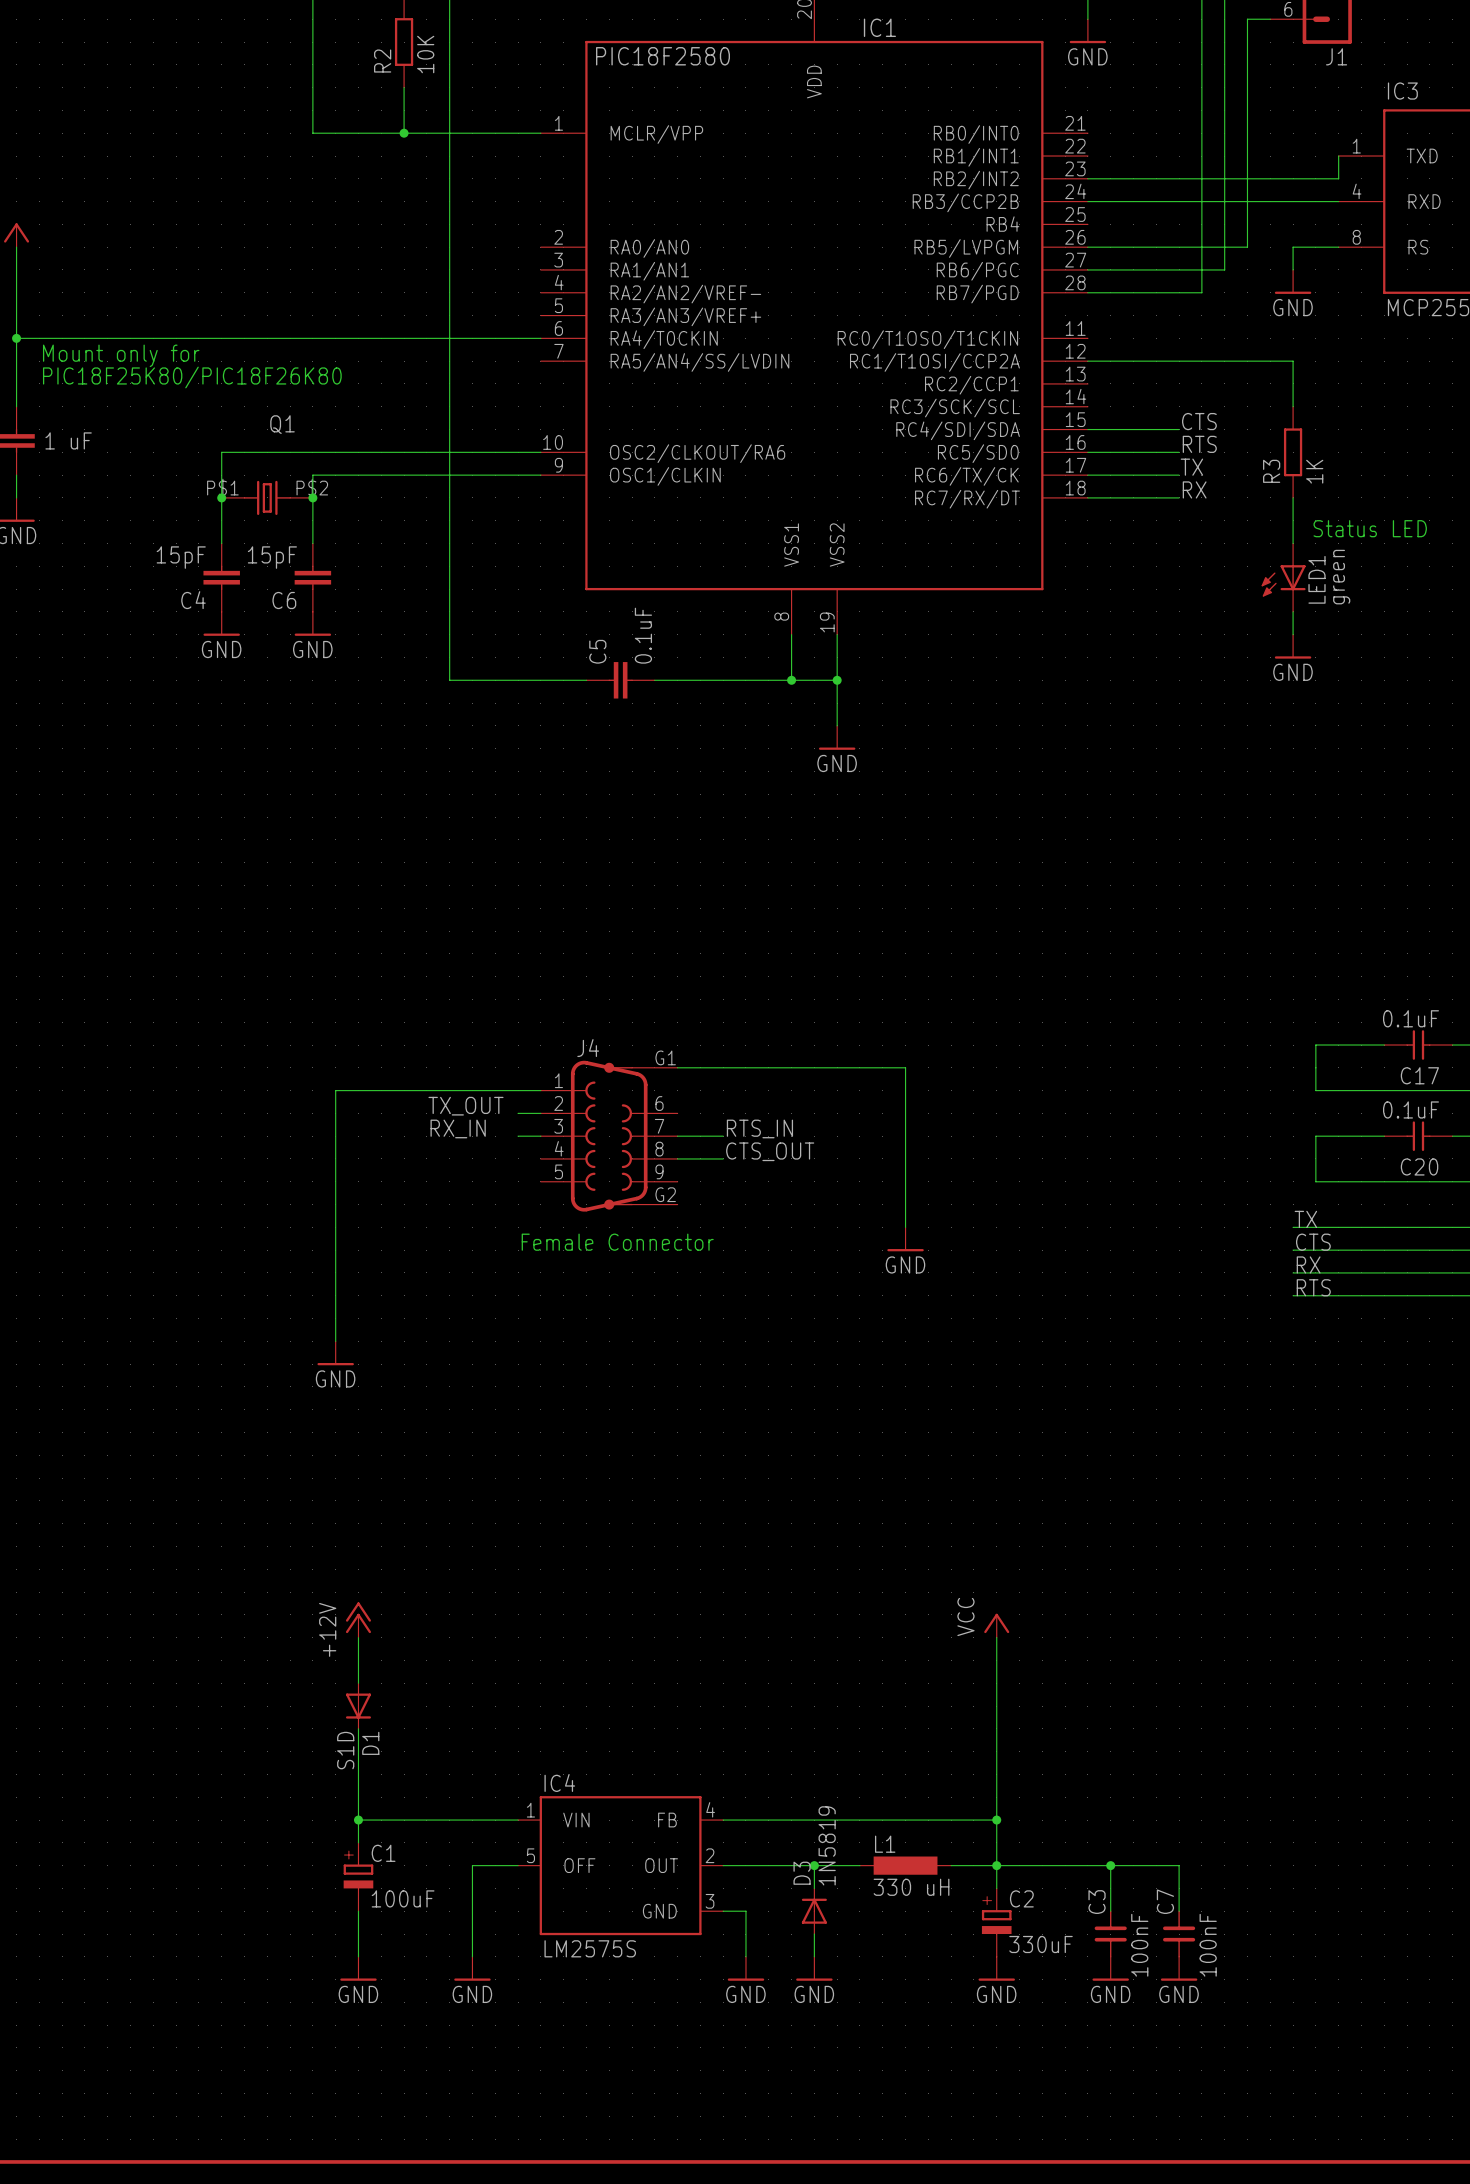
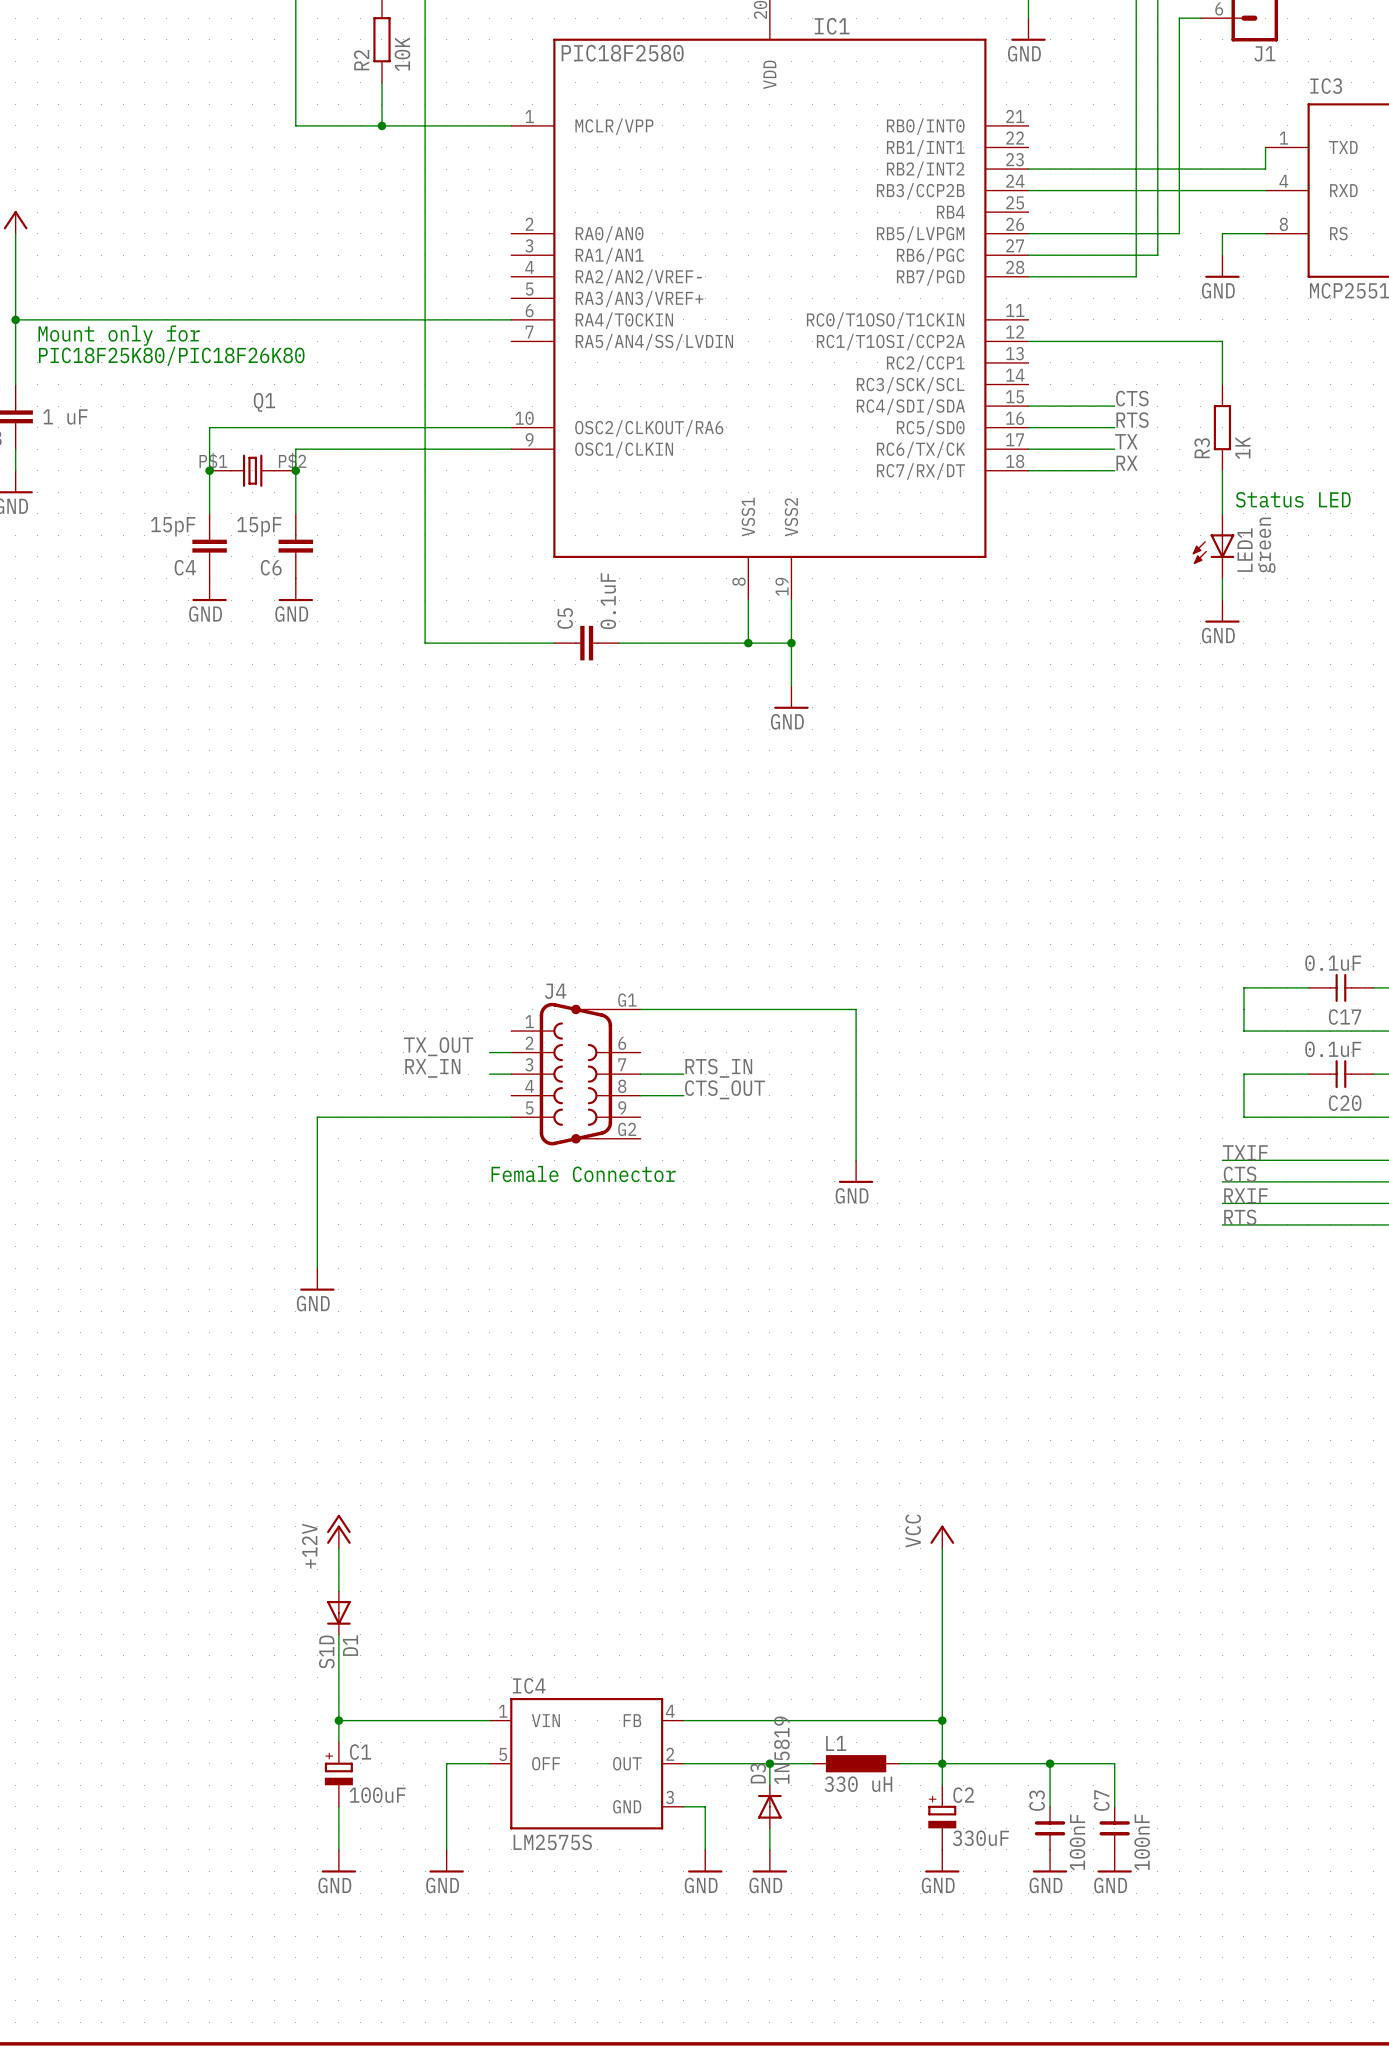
wire: (540, 1090) (335, 1090) (335, 1181) -> (511, 1117) (317, 1117)
label: TX (1305, 1219) -> TXIF (1245, 1152)
label: RX (1308, 1264) -> RXIF (1245, 1195)

